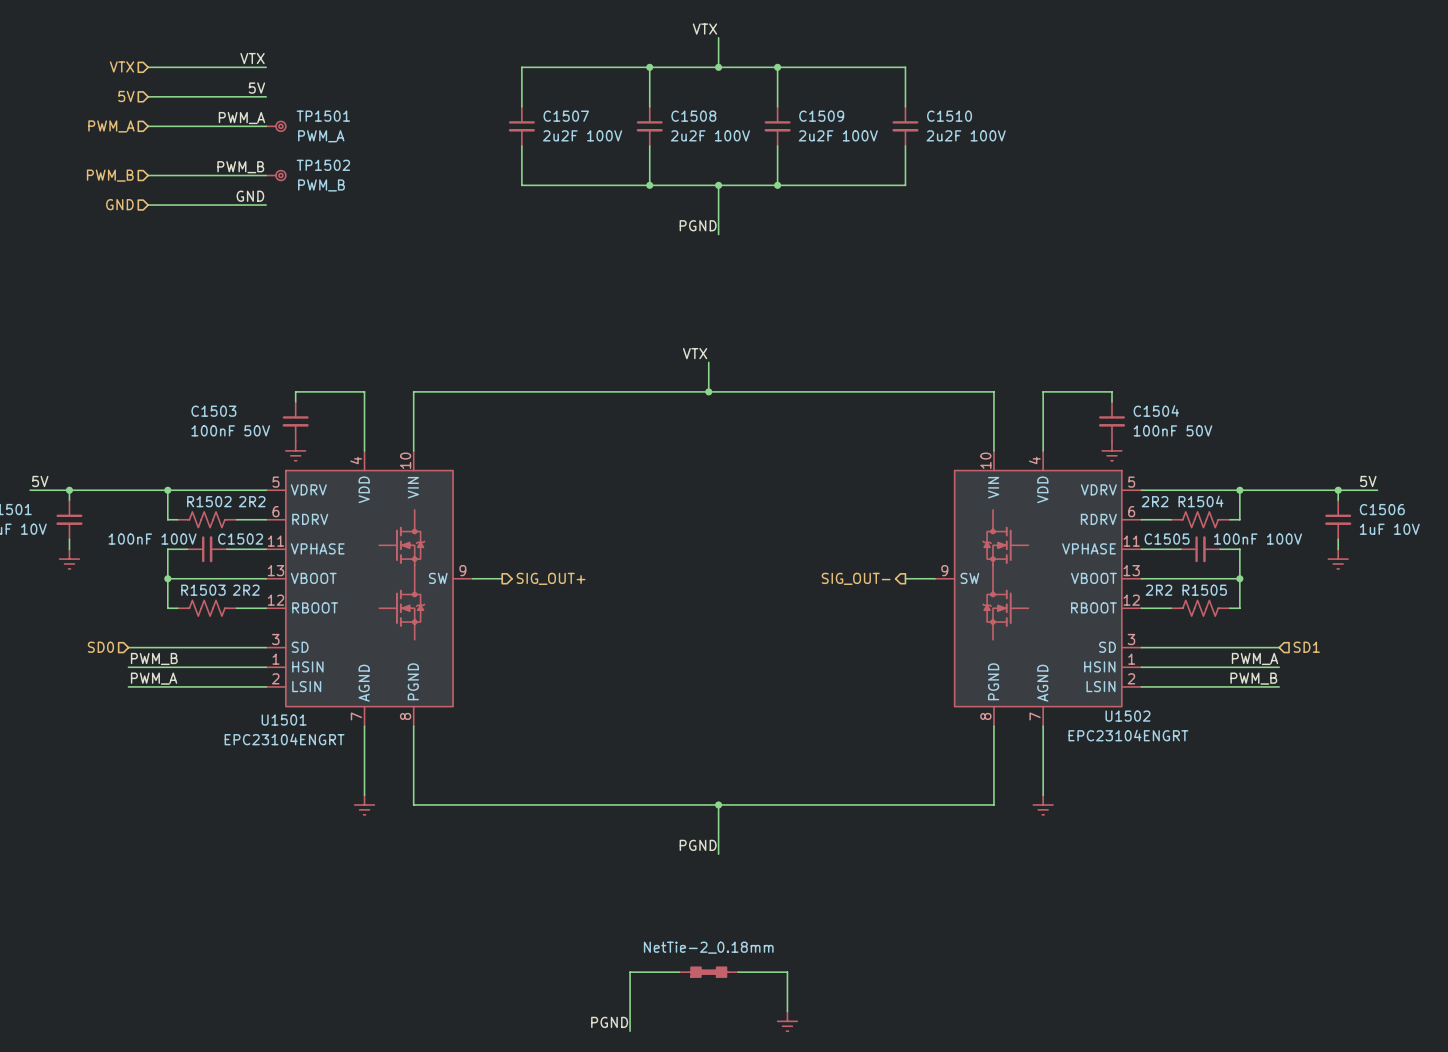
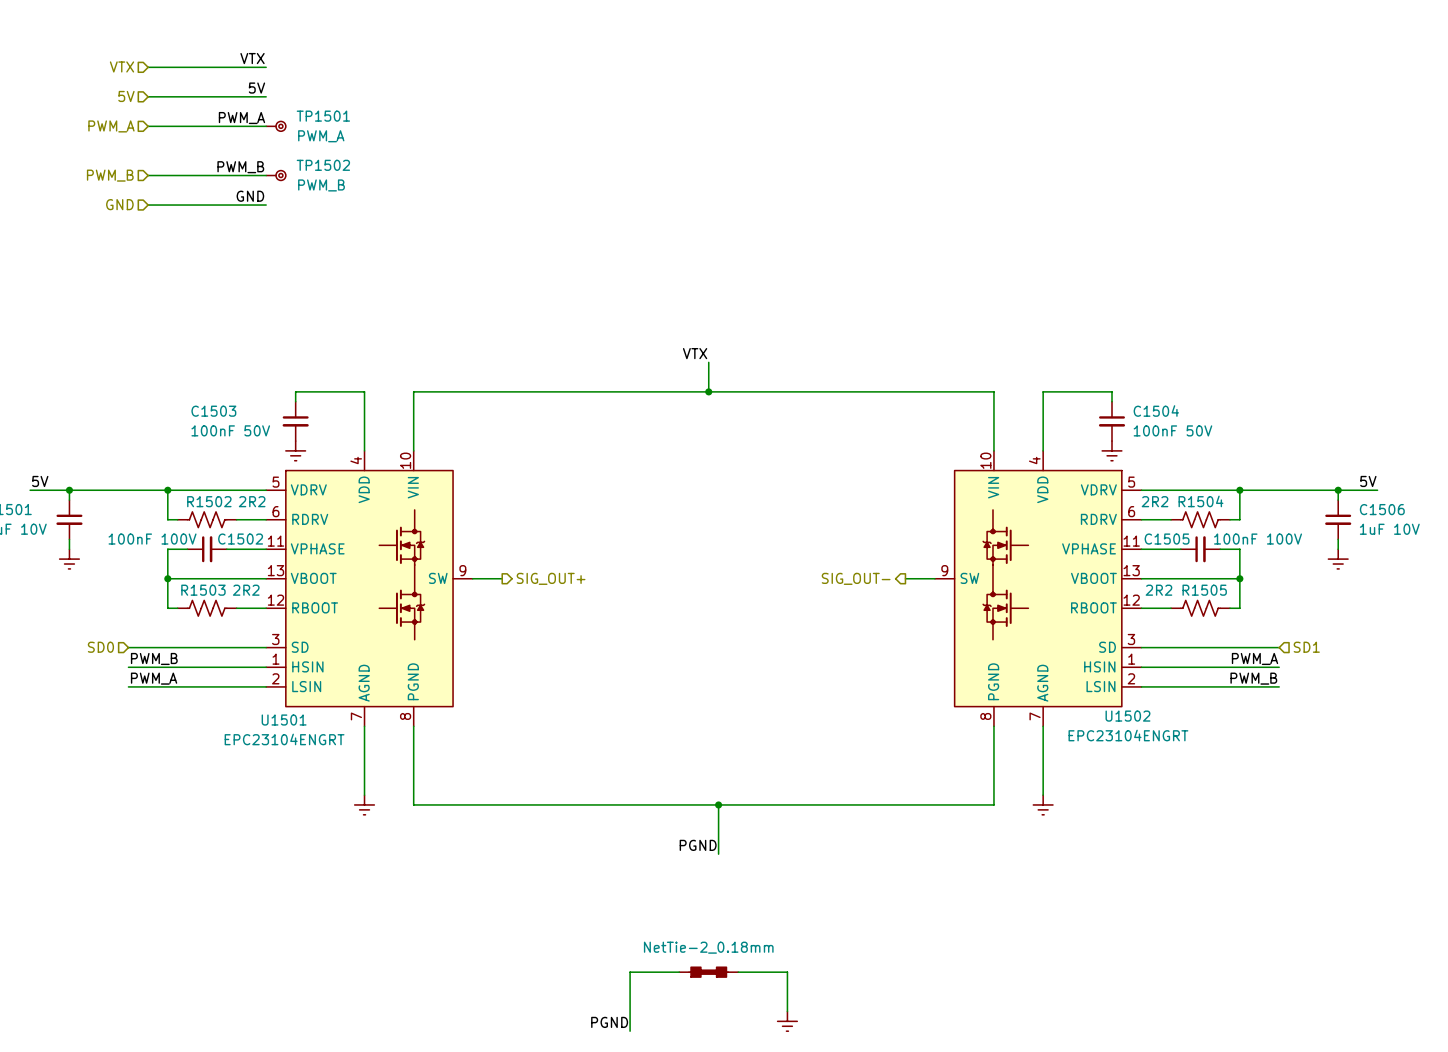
label: VTX (704, 29) -> none
wire: (718, 37) (718, 67) -> none
wire: (649, 67) (649, 106) -> none
junction: (649, 67) -> none
junction: (718, 67) -> none
wire: (777, 67) (777, 106) -> none
junction: (777, 67) -> none
wire: (521, 106) (521, 67) (905, 67) (905, 106) -> none
C1507: 2u2F 100V (521, 126) -> none
C1508: 2u2F 100V (649, 126) -> none
C1509: 2u2F 100V (777, 126) -> none
C1510: 2u2F 100V (905, 126) -> none
wire: (521, 146) (521, 185) (905, 185) (905, 146) -> none
wire: (649, 146) (649, 185) -> none
wire: (777, 146) (777, 185) -> none
junction: (649, 185) -> none
wire: (718, 185) (718, 234) -> none
junction: (718, 185) -> none
junction: (777, 185) -> none
label: PGND (698, 225) -> none

